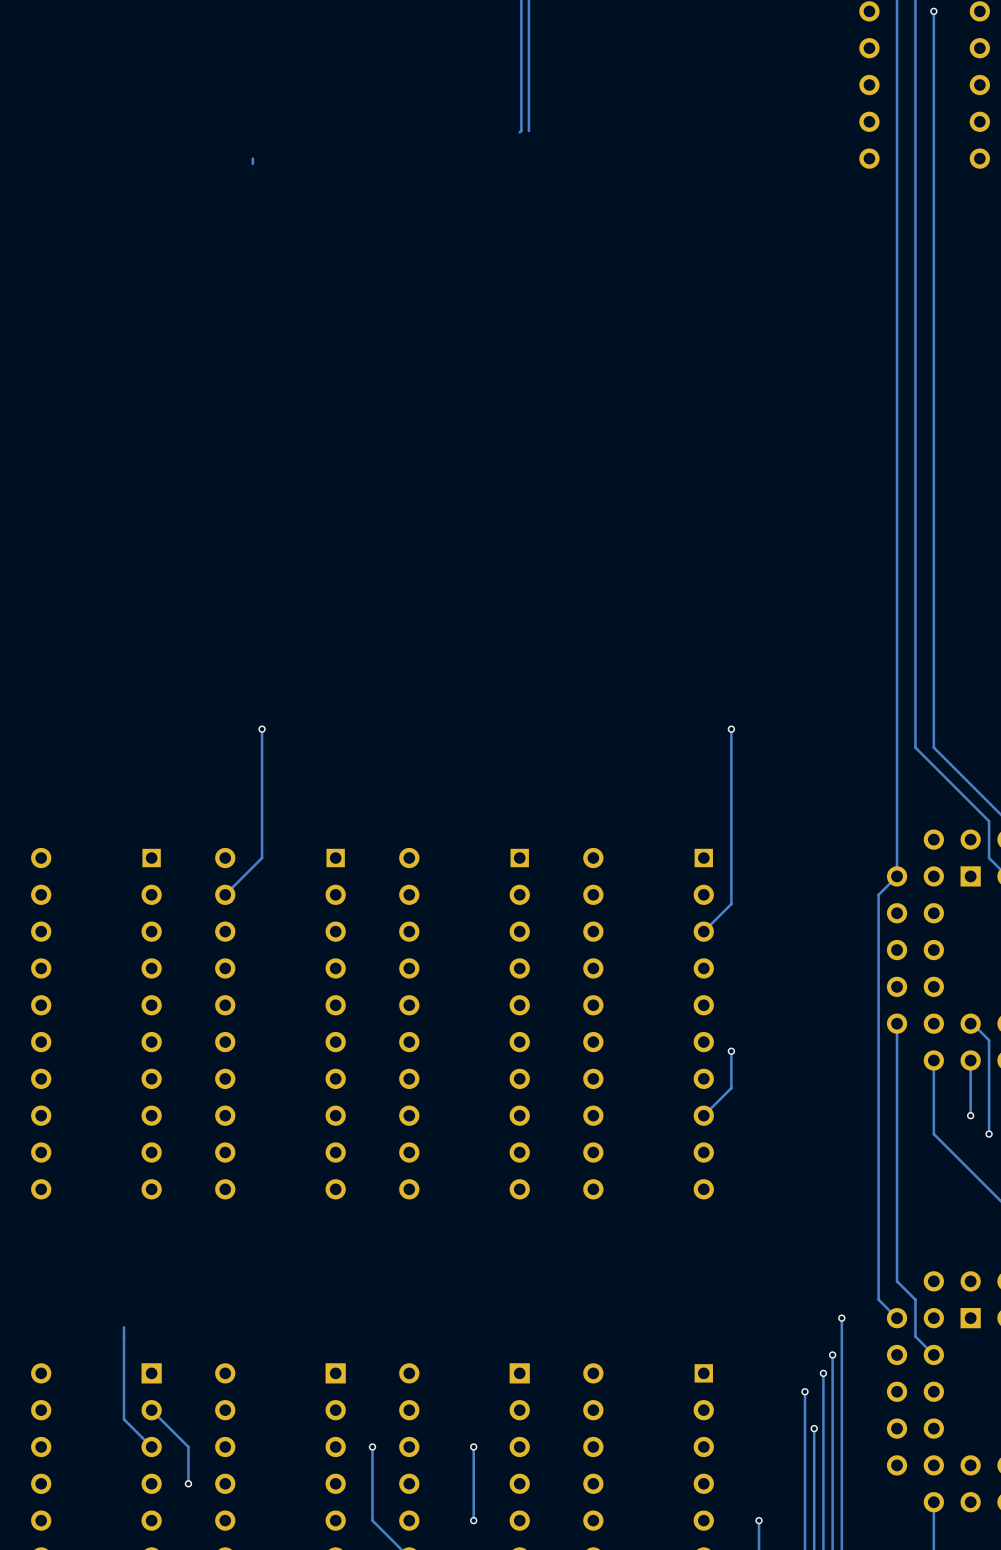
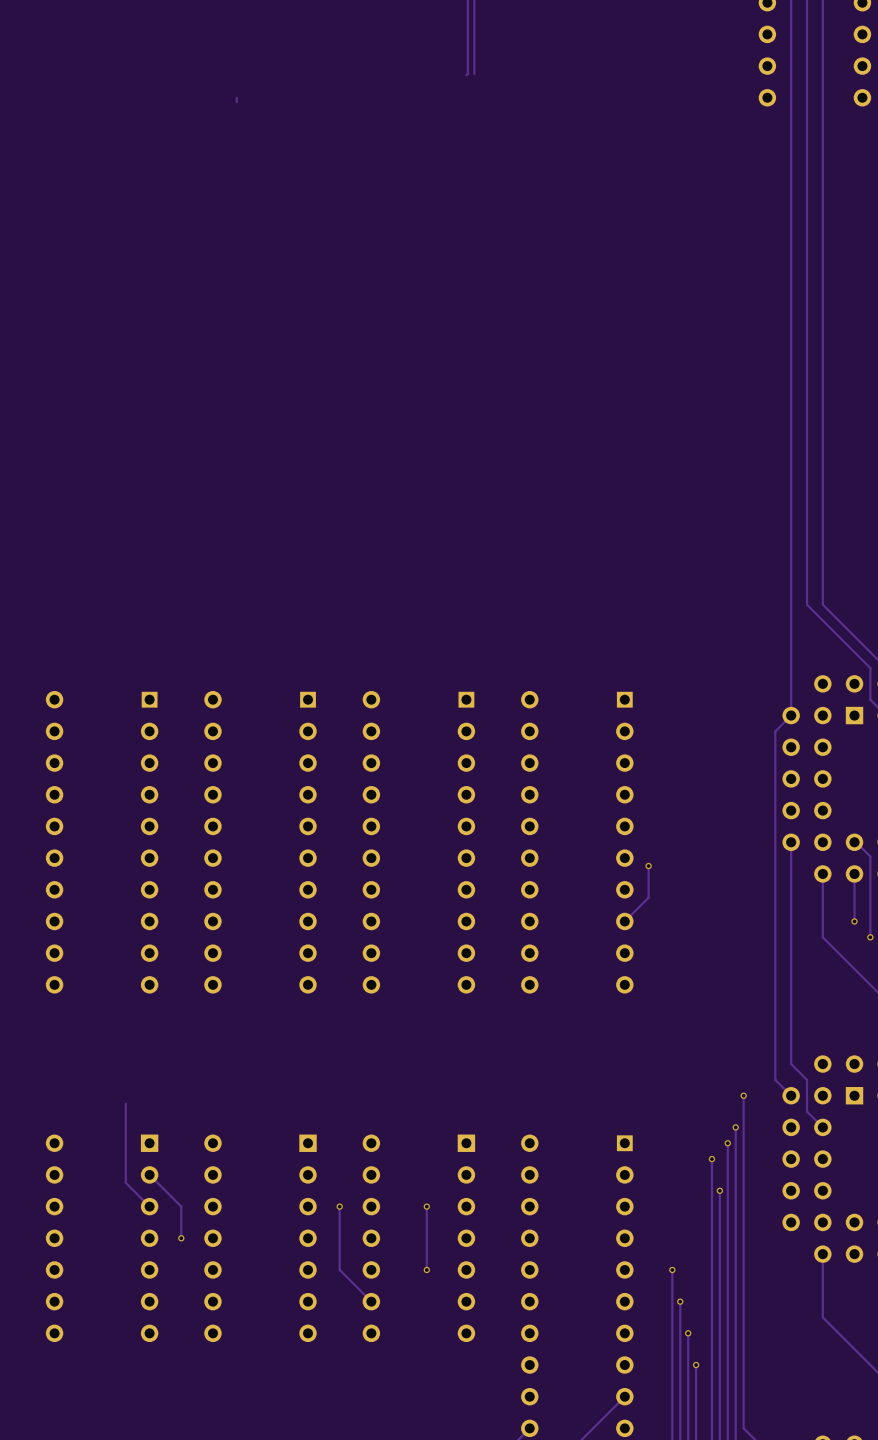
track: (262, 729) (262, 858) (225, 894) -> none
via: (262, 729) -> none
track: (731, 729) (731, 904) (703, 931) -> none
via: (731, 729) -> none

